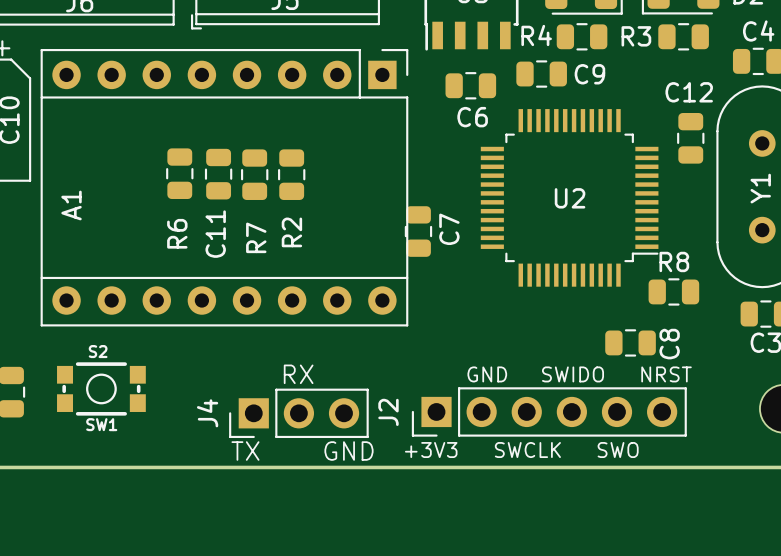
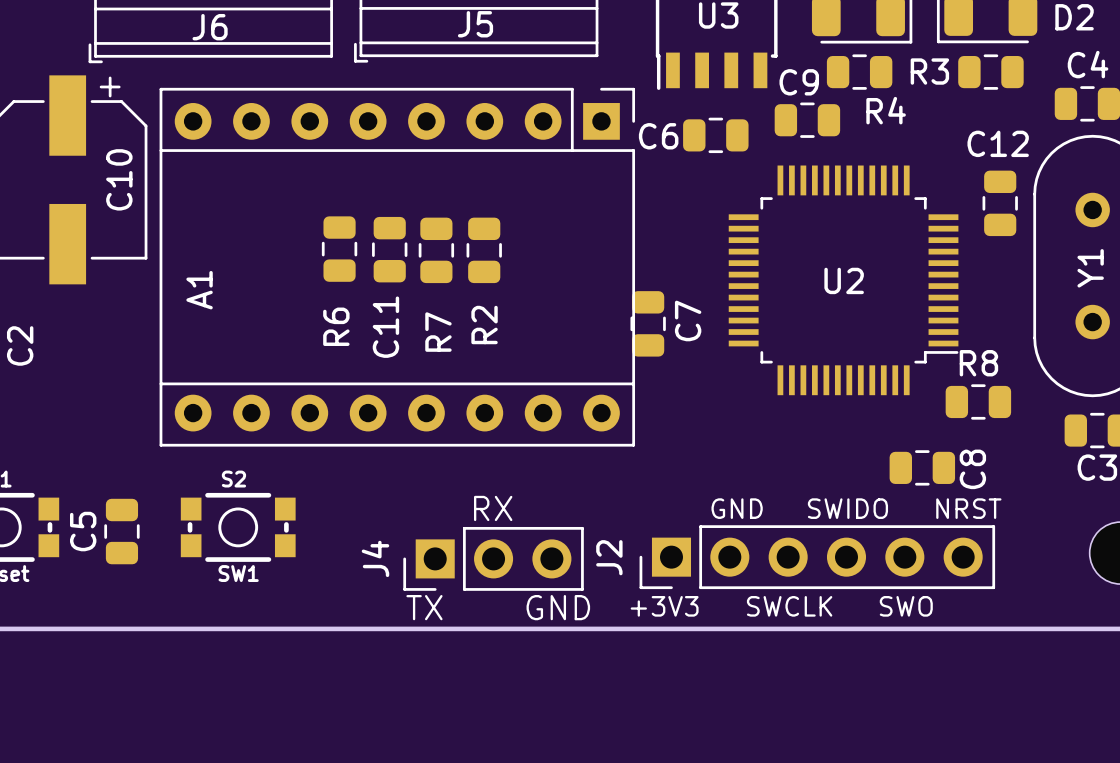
R4 name position: R4 (536, 35) -> R4 (886, 110)
C9 name position: C9 (589, 74) -> C9 (799, 82)
C6 name position: C6 (472, 117) -> C6 (658, 136)

